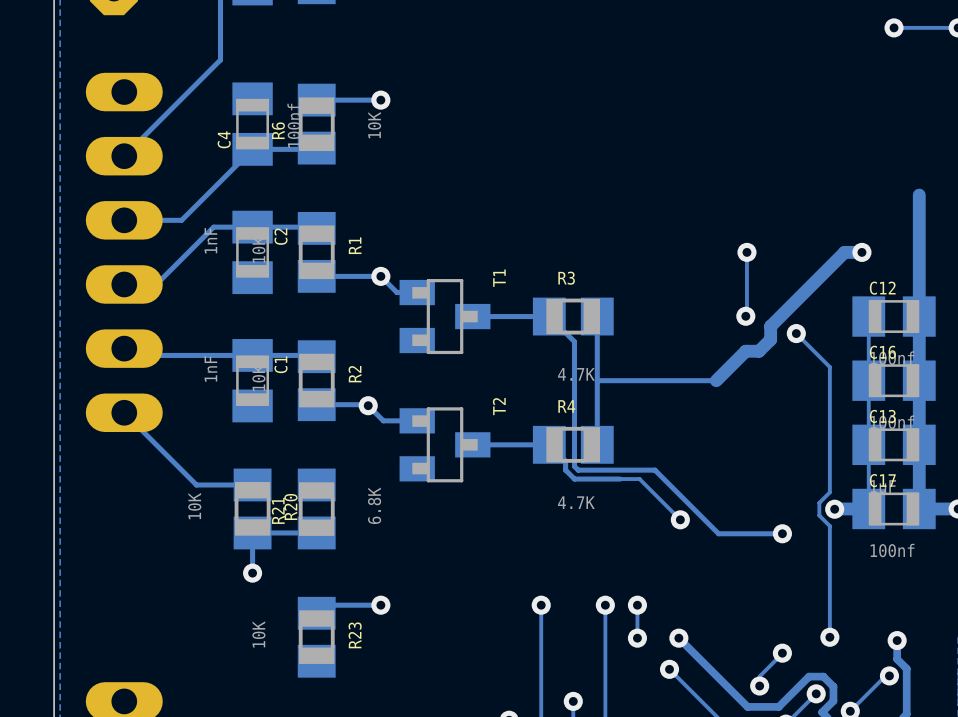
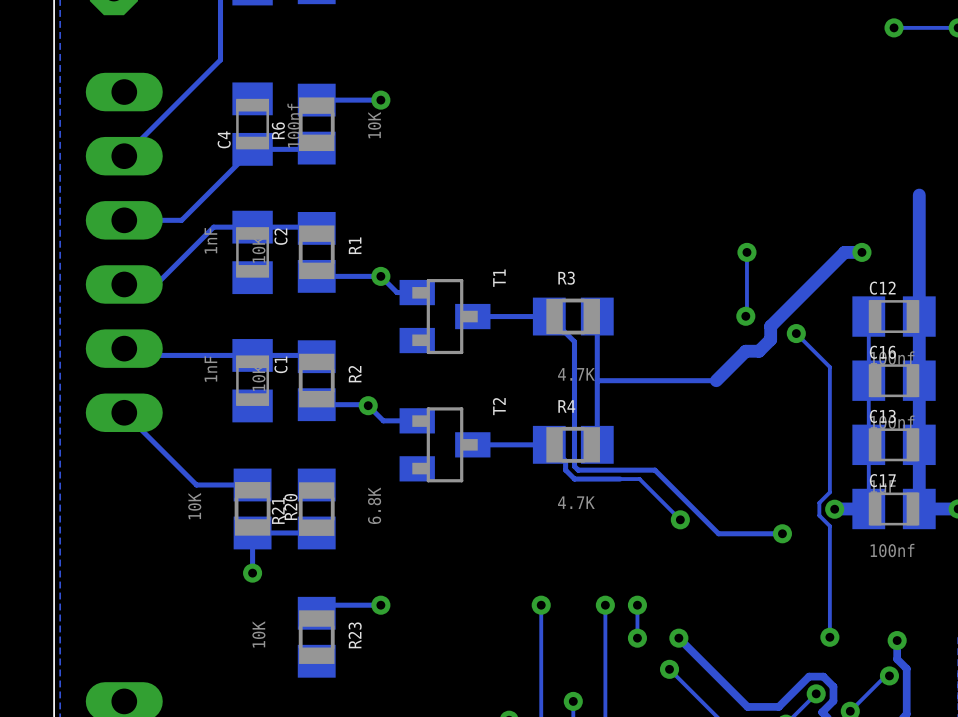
track: (782, 653) (759, 676) (759, 686) -> none
via: (782, 653) -> none
via: (759, 686) -> none

